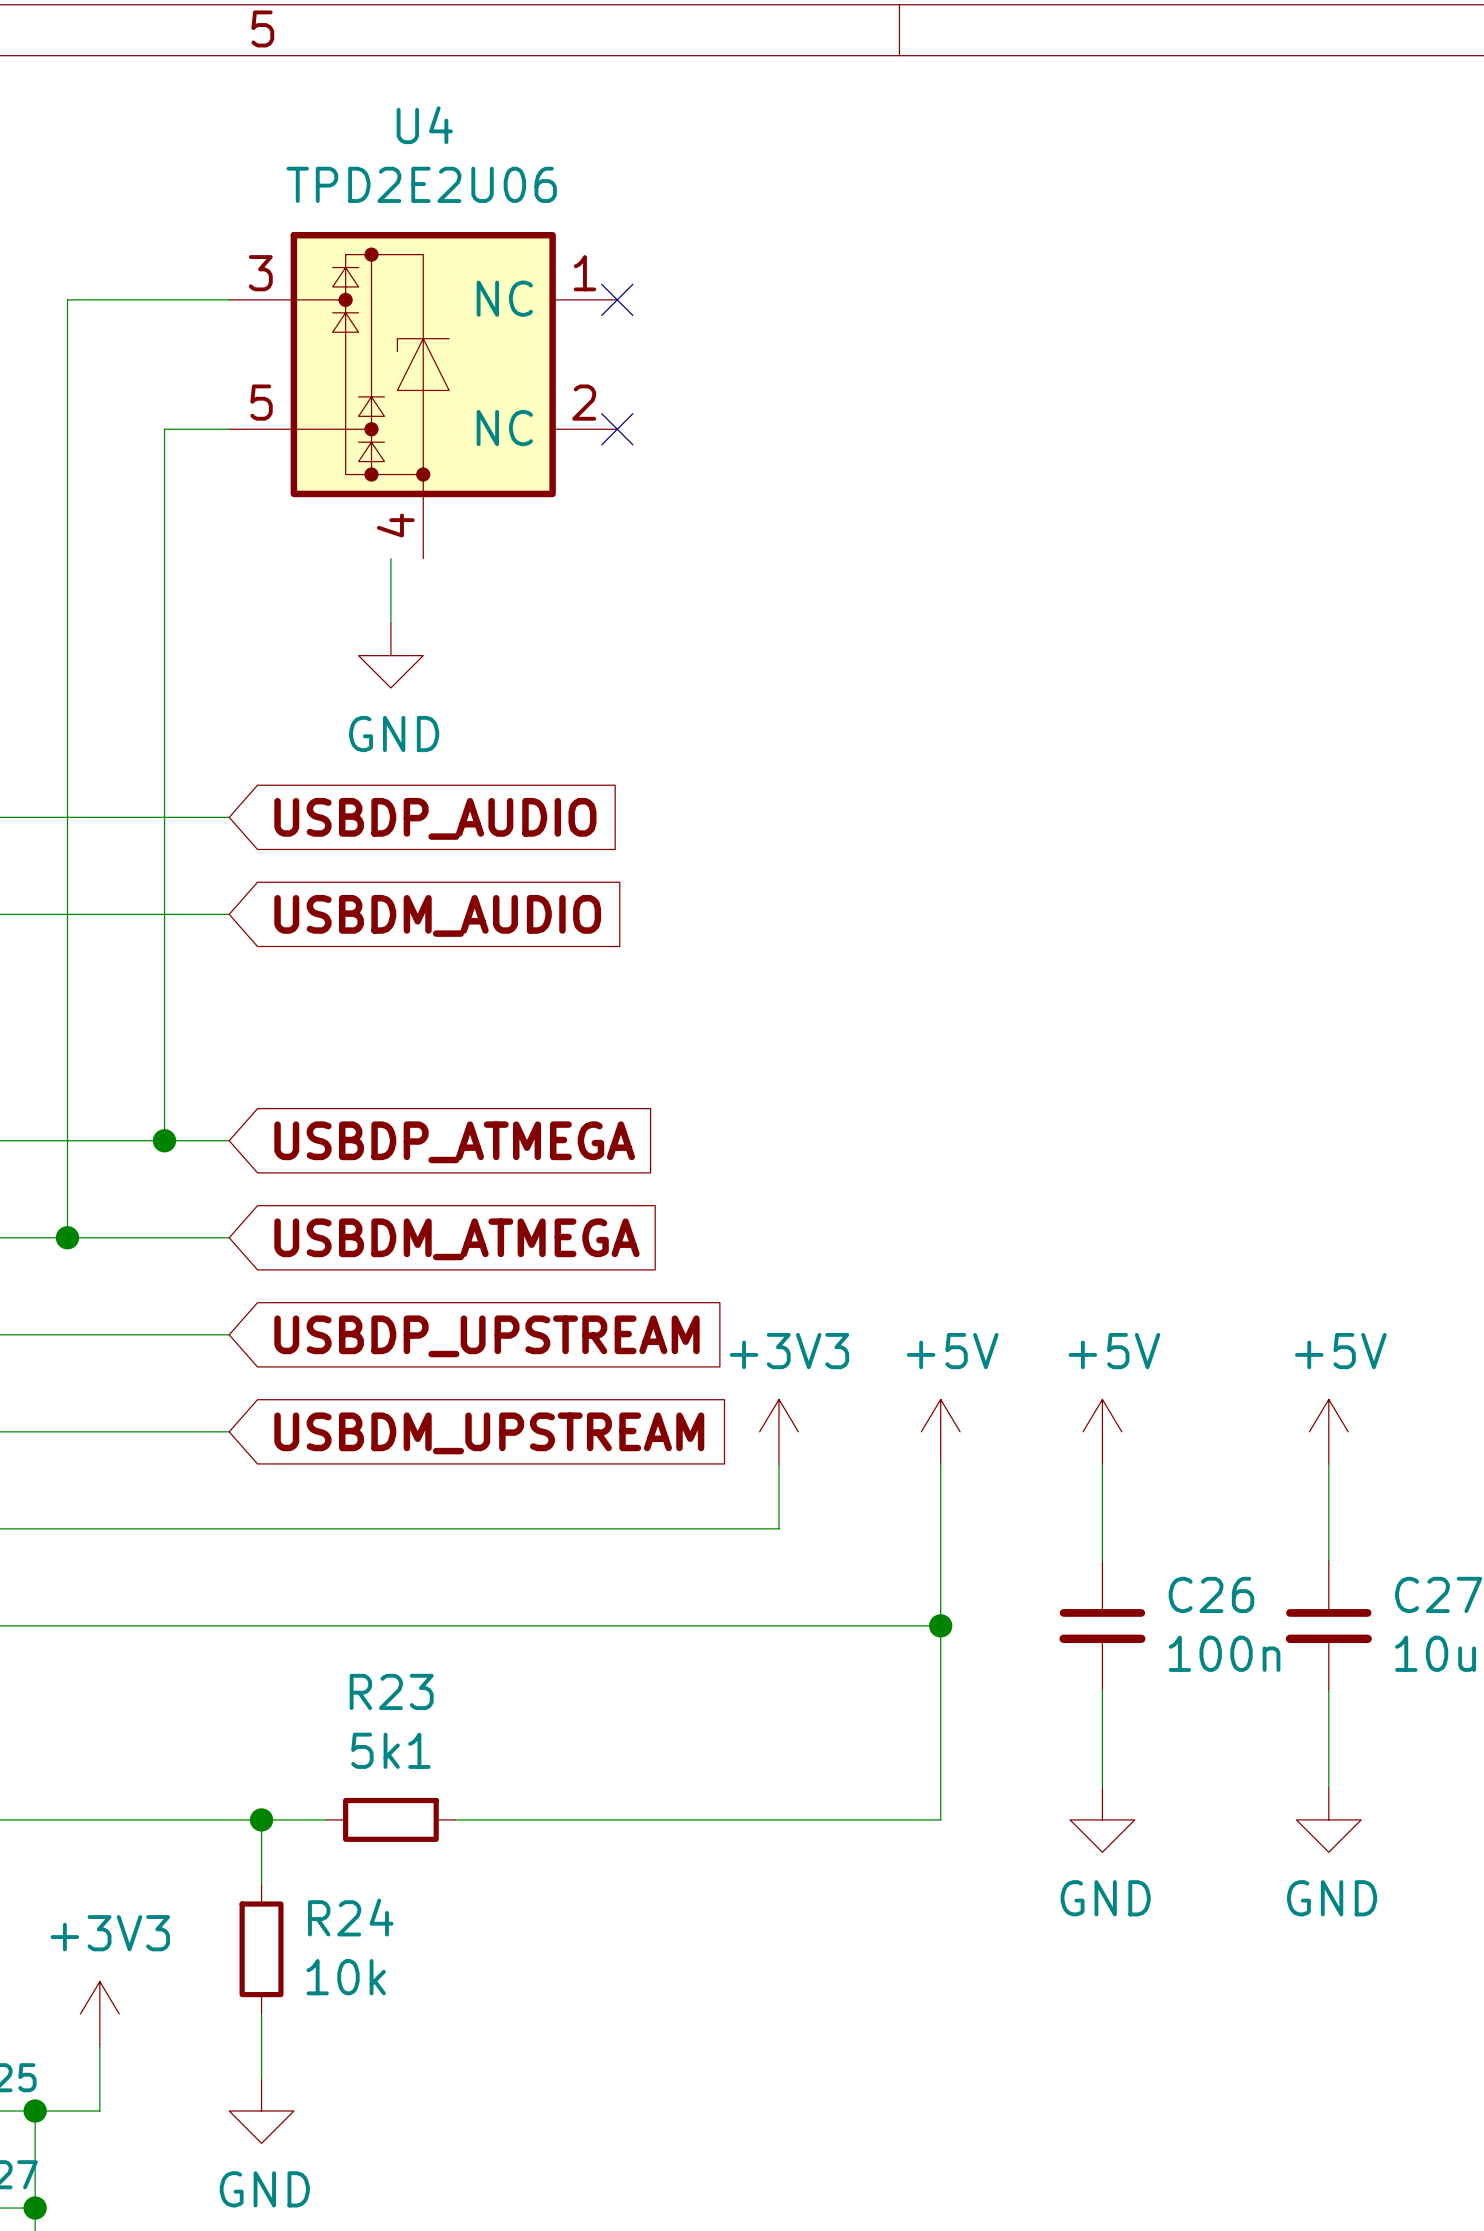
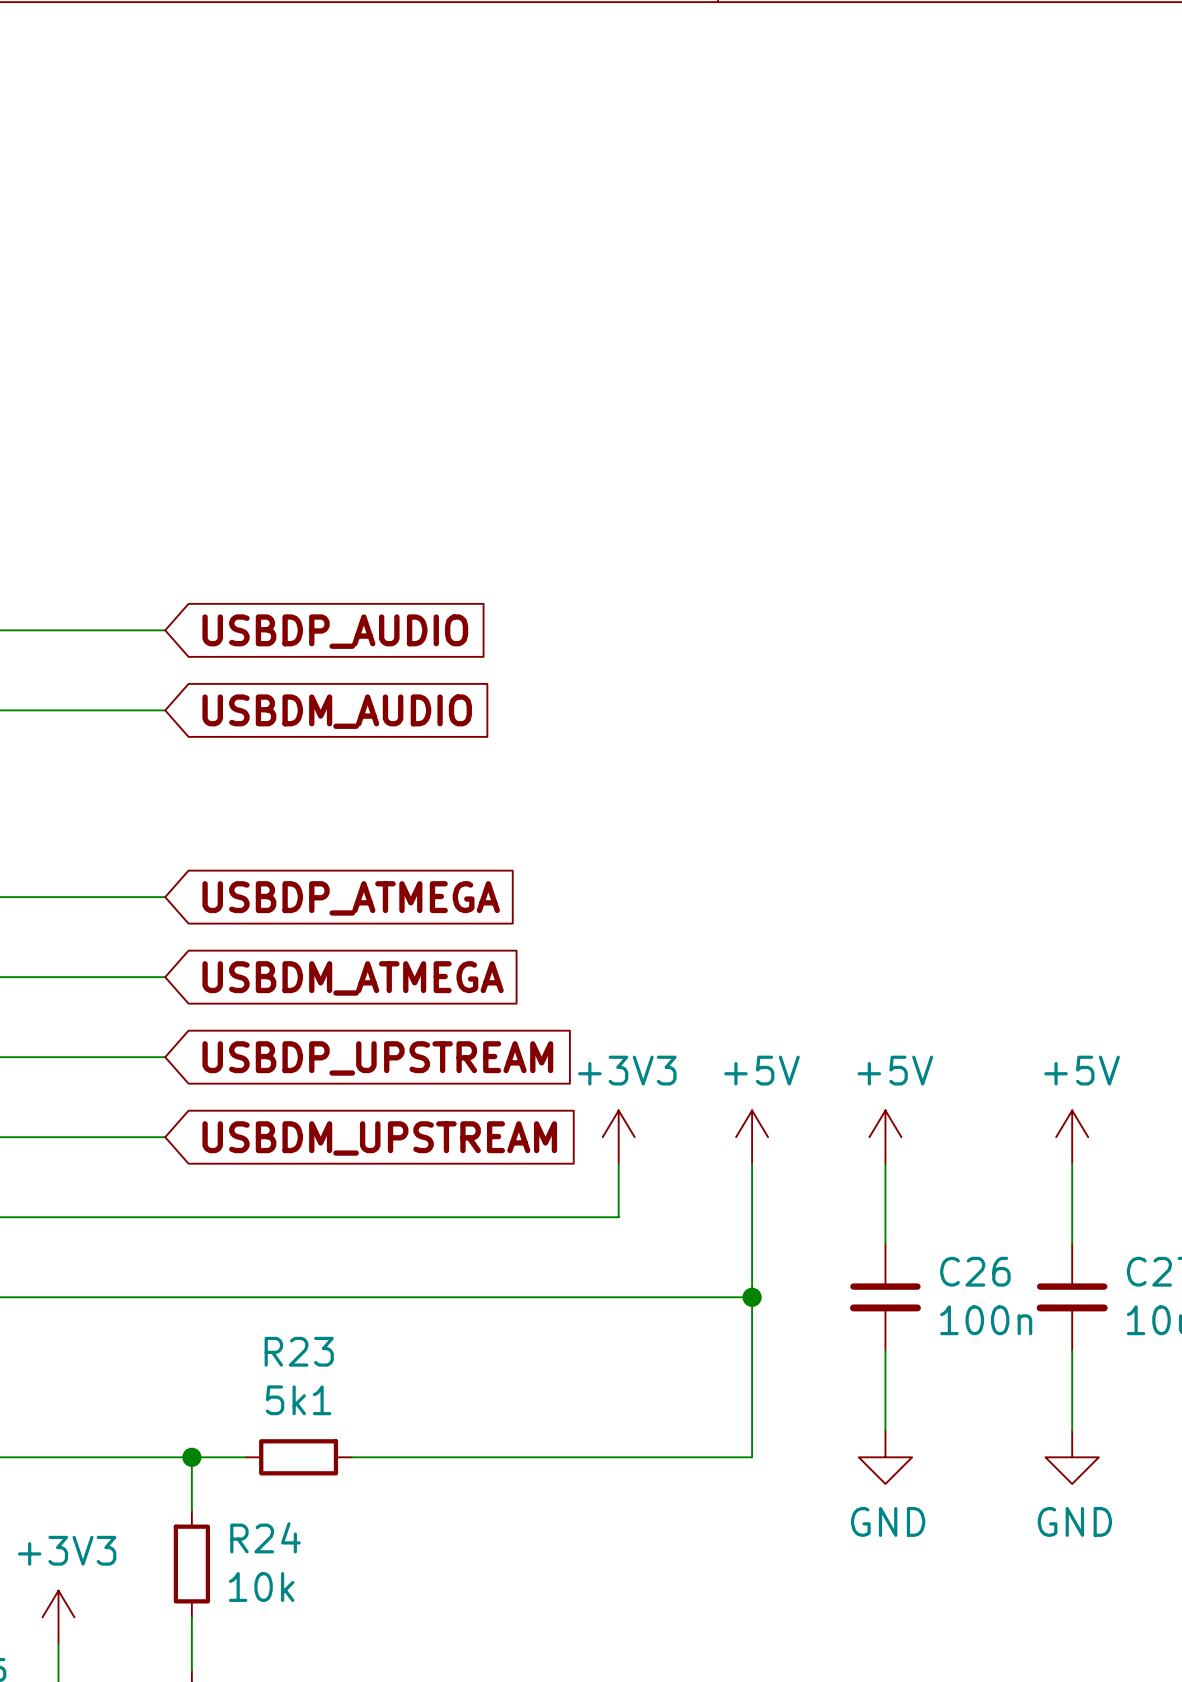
wire: (229, 299) (67, 299) (67, 1237) -> none
no-connect mark: (617, 299) -> none
U4: TPD2E2U06 (423, 395) -> none
wire: (229, 429) (164, 429) (164, 1140) -> none
no-connect mark: (617, 429) -> none
wire: (390, 558) (390, 623) -> none
power symbol: GND (390, 655) -> none
junction: (164, 1140) -> none
junction: (67, 1237) -> none

